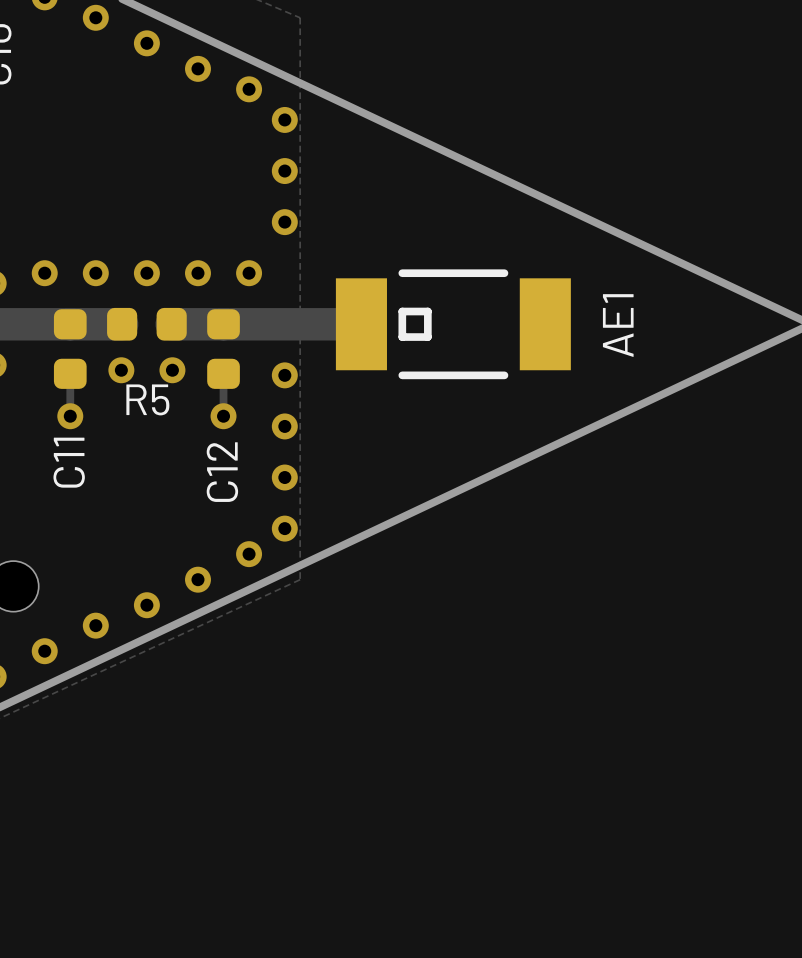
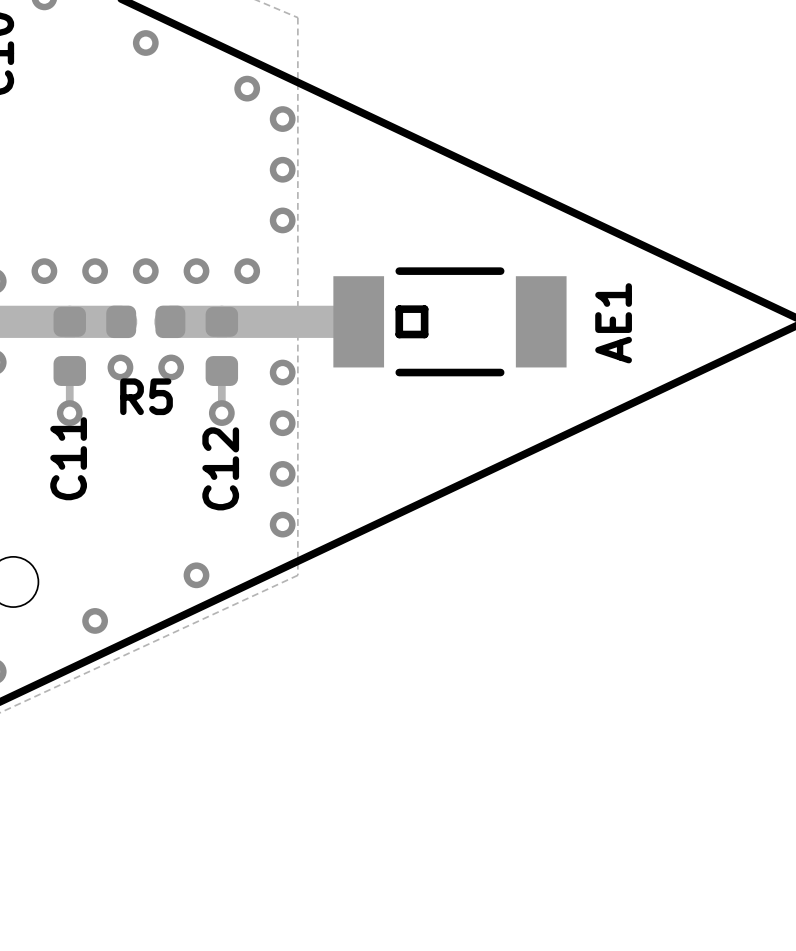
via: (95, 17) -> none
via: (197, 68) -> none
via: (249, 554) -> none
via: (146, 605) -> none
via: (44, 651) -> none

